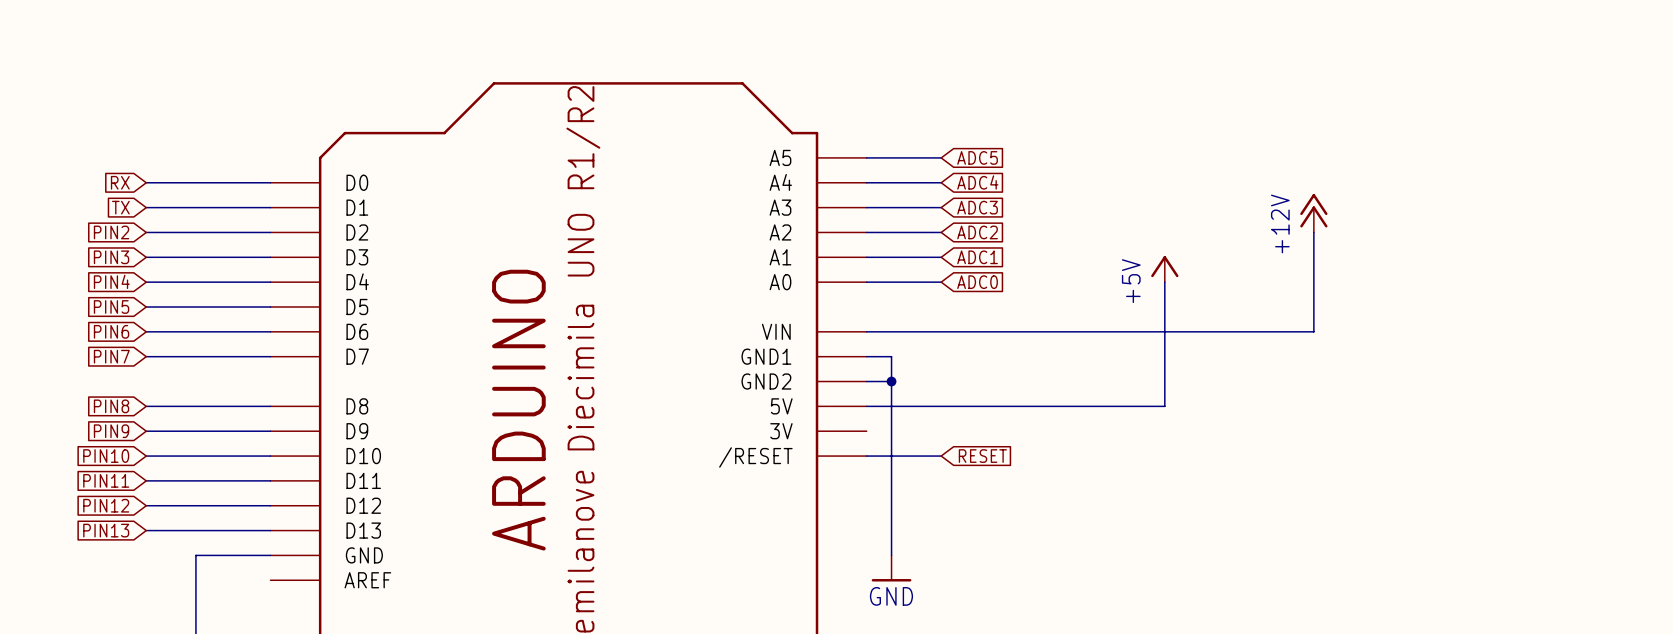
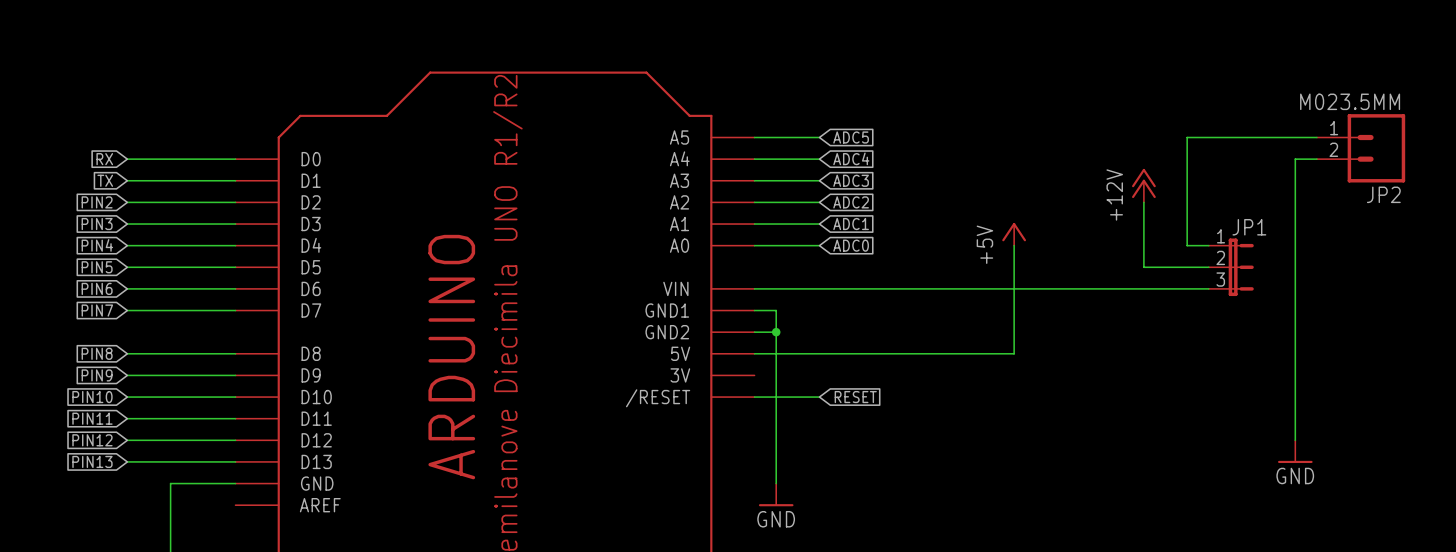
wire: none -> (1316, 137) (1187, 137) (1187, 245) (1208, 245)
JP2: none -> M023.5MM (1361, 148)
wire: none -> (1316, 159) (1295, 159) (1295, 440)
wire: (1313, 306) (1313, 331) -> (1143, 267) (1208, 267)
JP1: none -> (1231, 267)
wire: none -> (1143, 288) (1208, 288)
power symbol: none -> GND (1295, 451)

